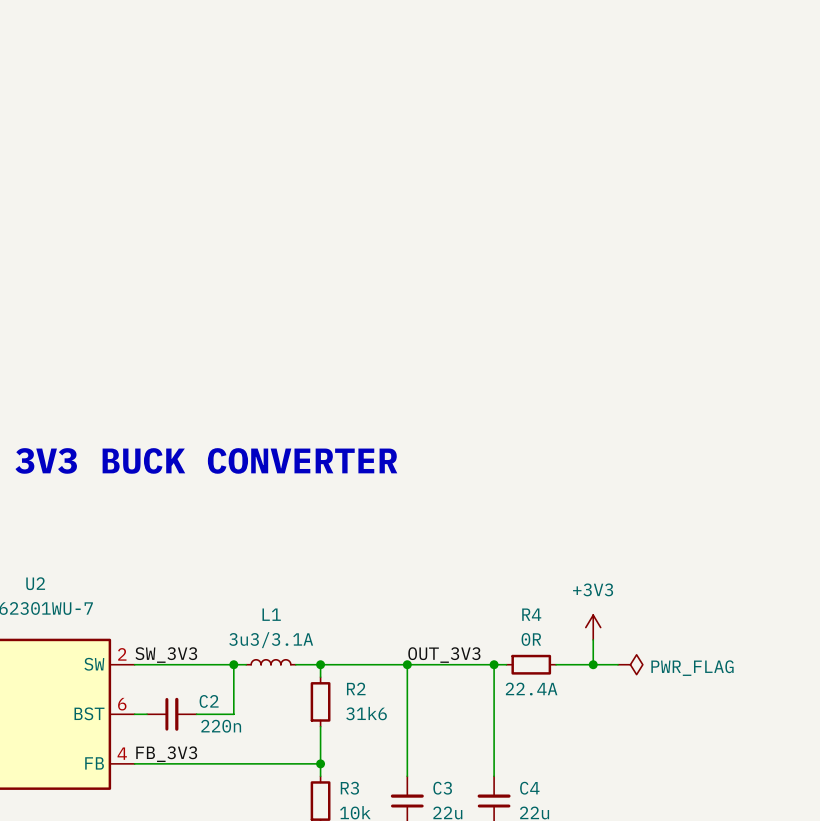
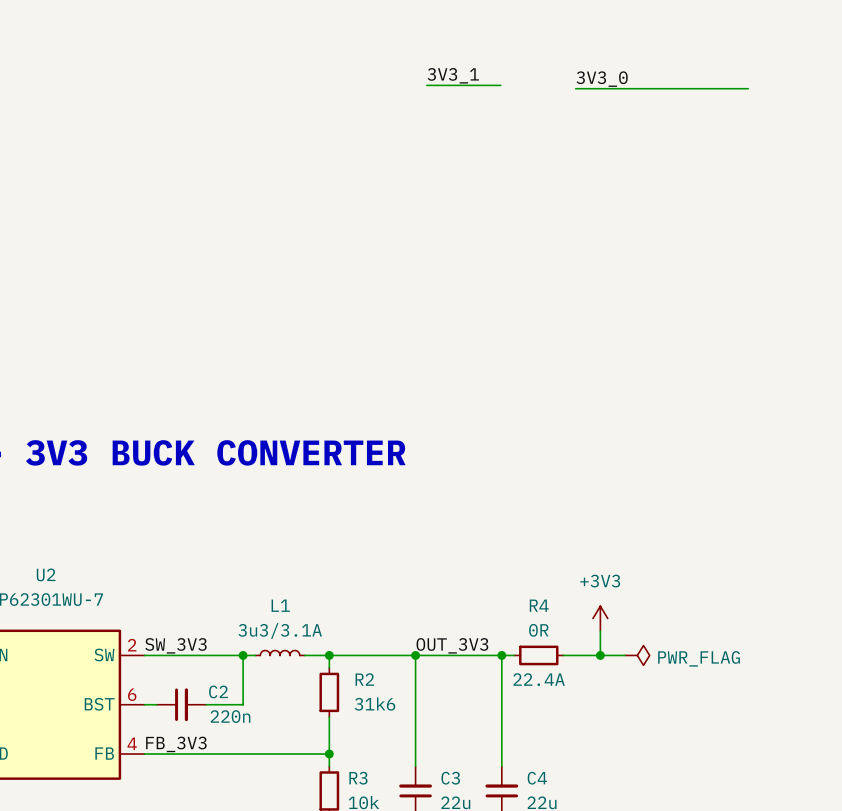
label: none -> 3V3_1 (453, 75)
label: none -> 3V3_0 (602, 79)
wire: none -> (426, 85) (500, 85)
wire: none -> (575, 88) (748, 88)

